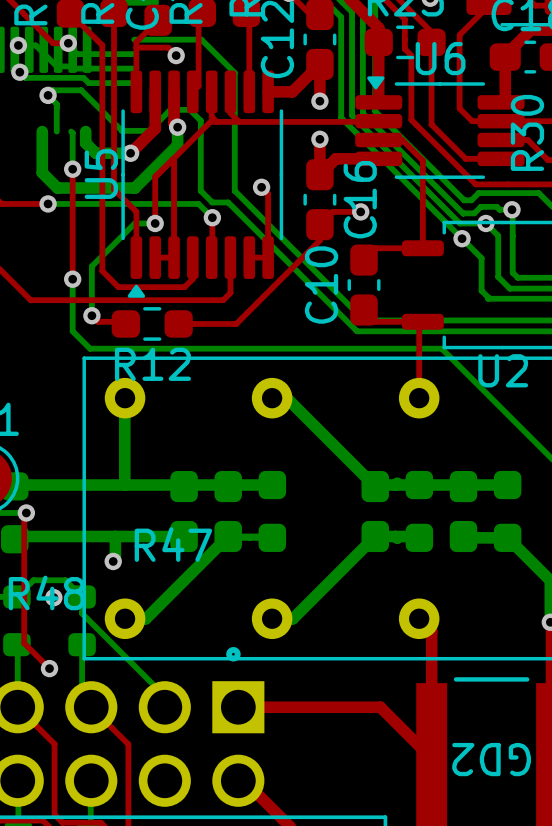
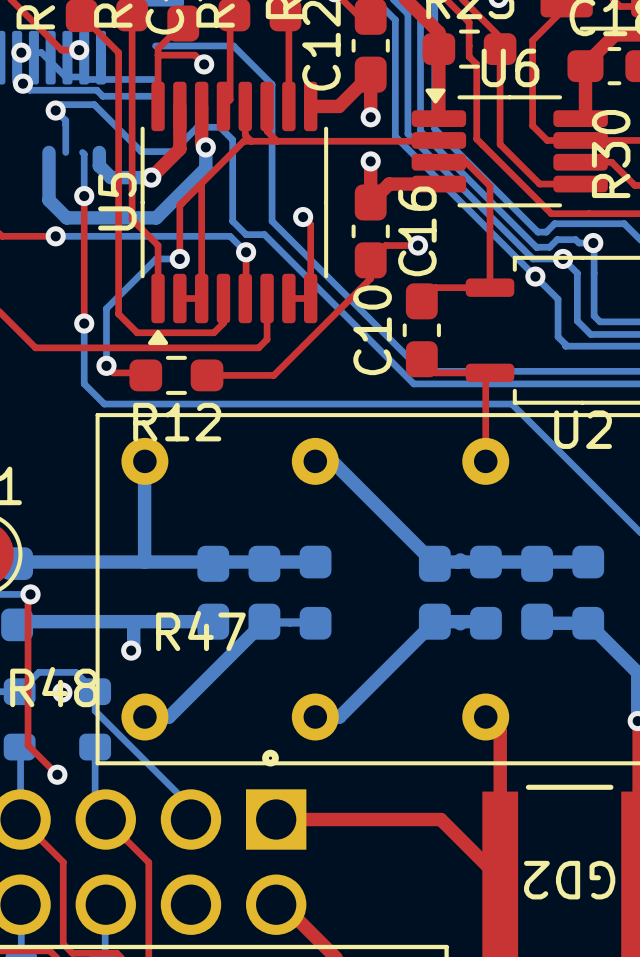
bottom track: (68, 43) (77, 54) (134, 54) -> none

